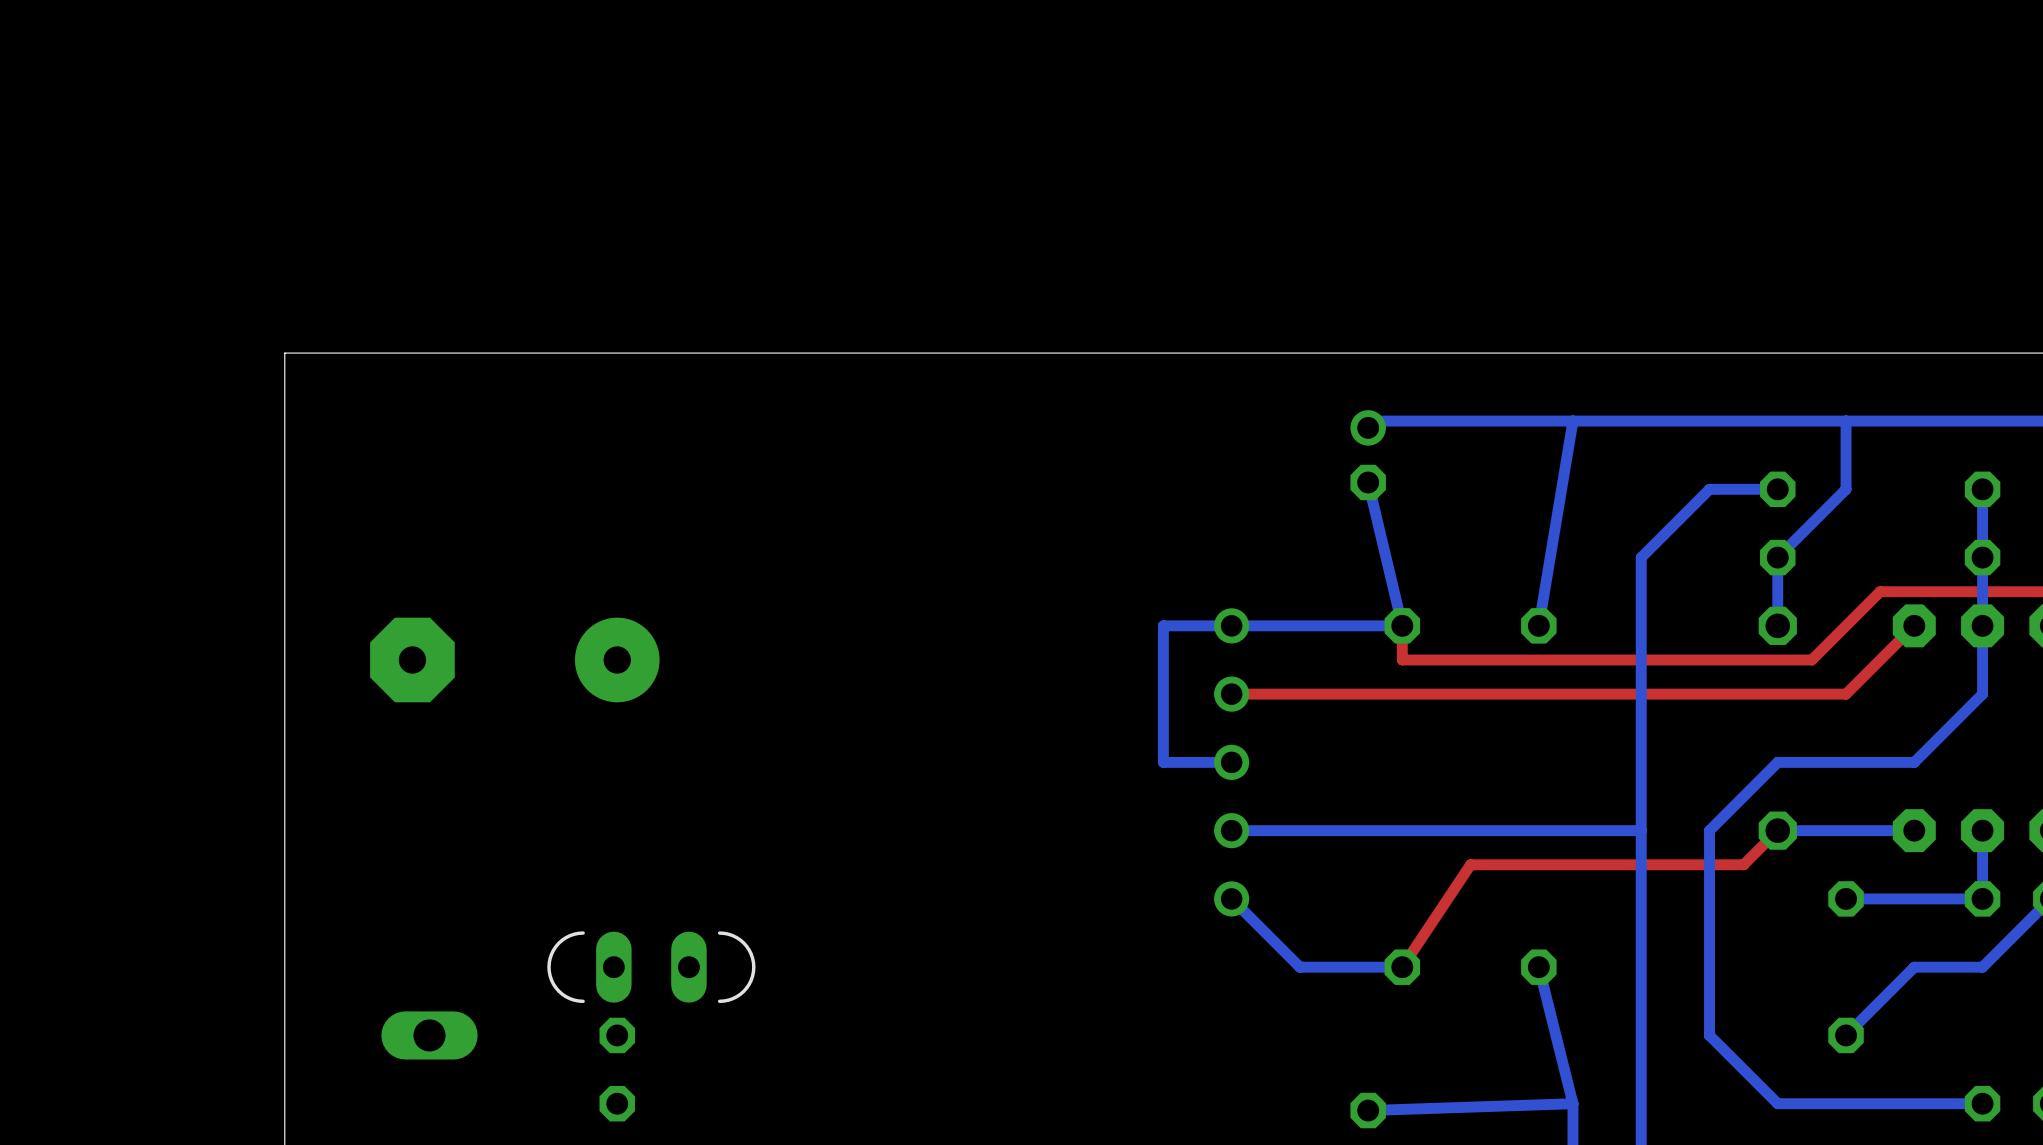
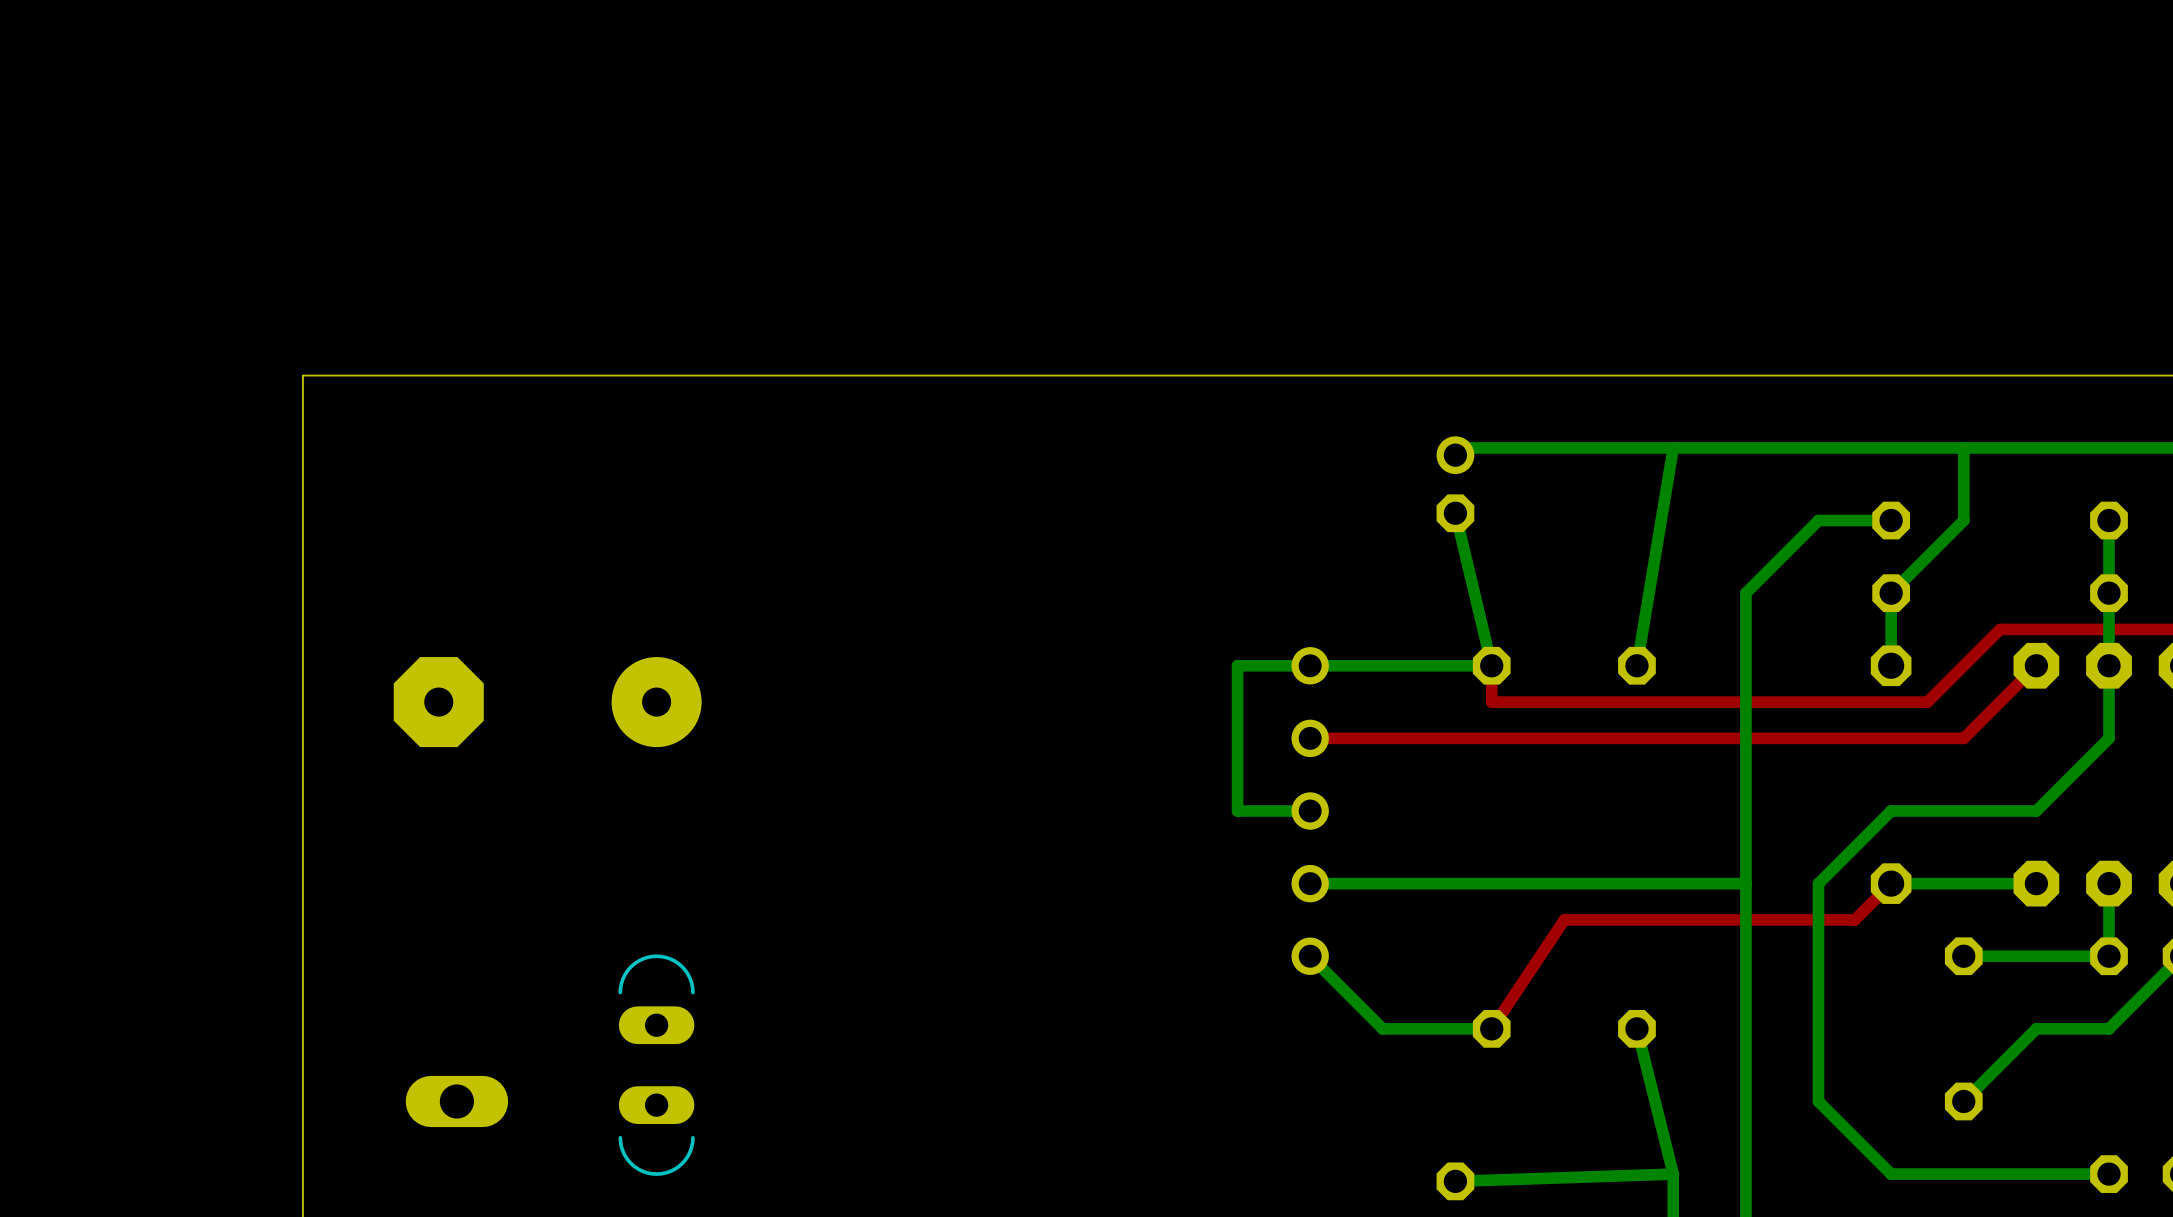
part rotation: 0° (651, 967) -> 90° clockwise (656, 1065)
part: (617, 1069) -> none

